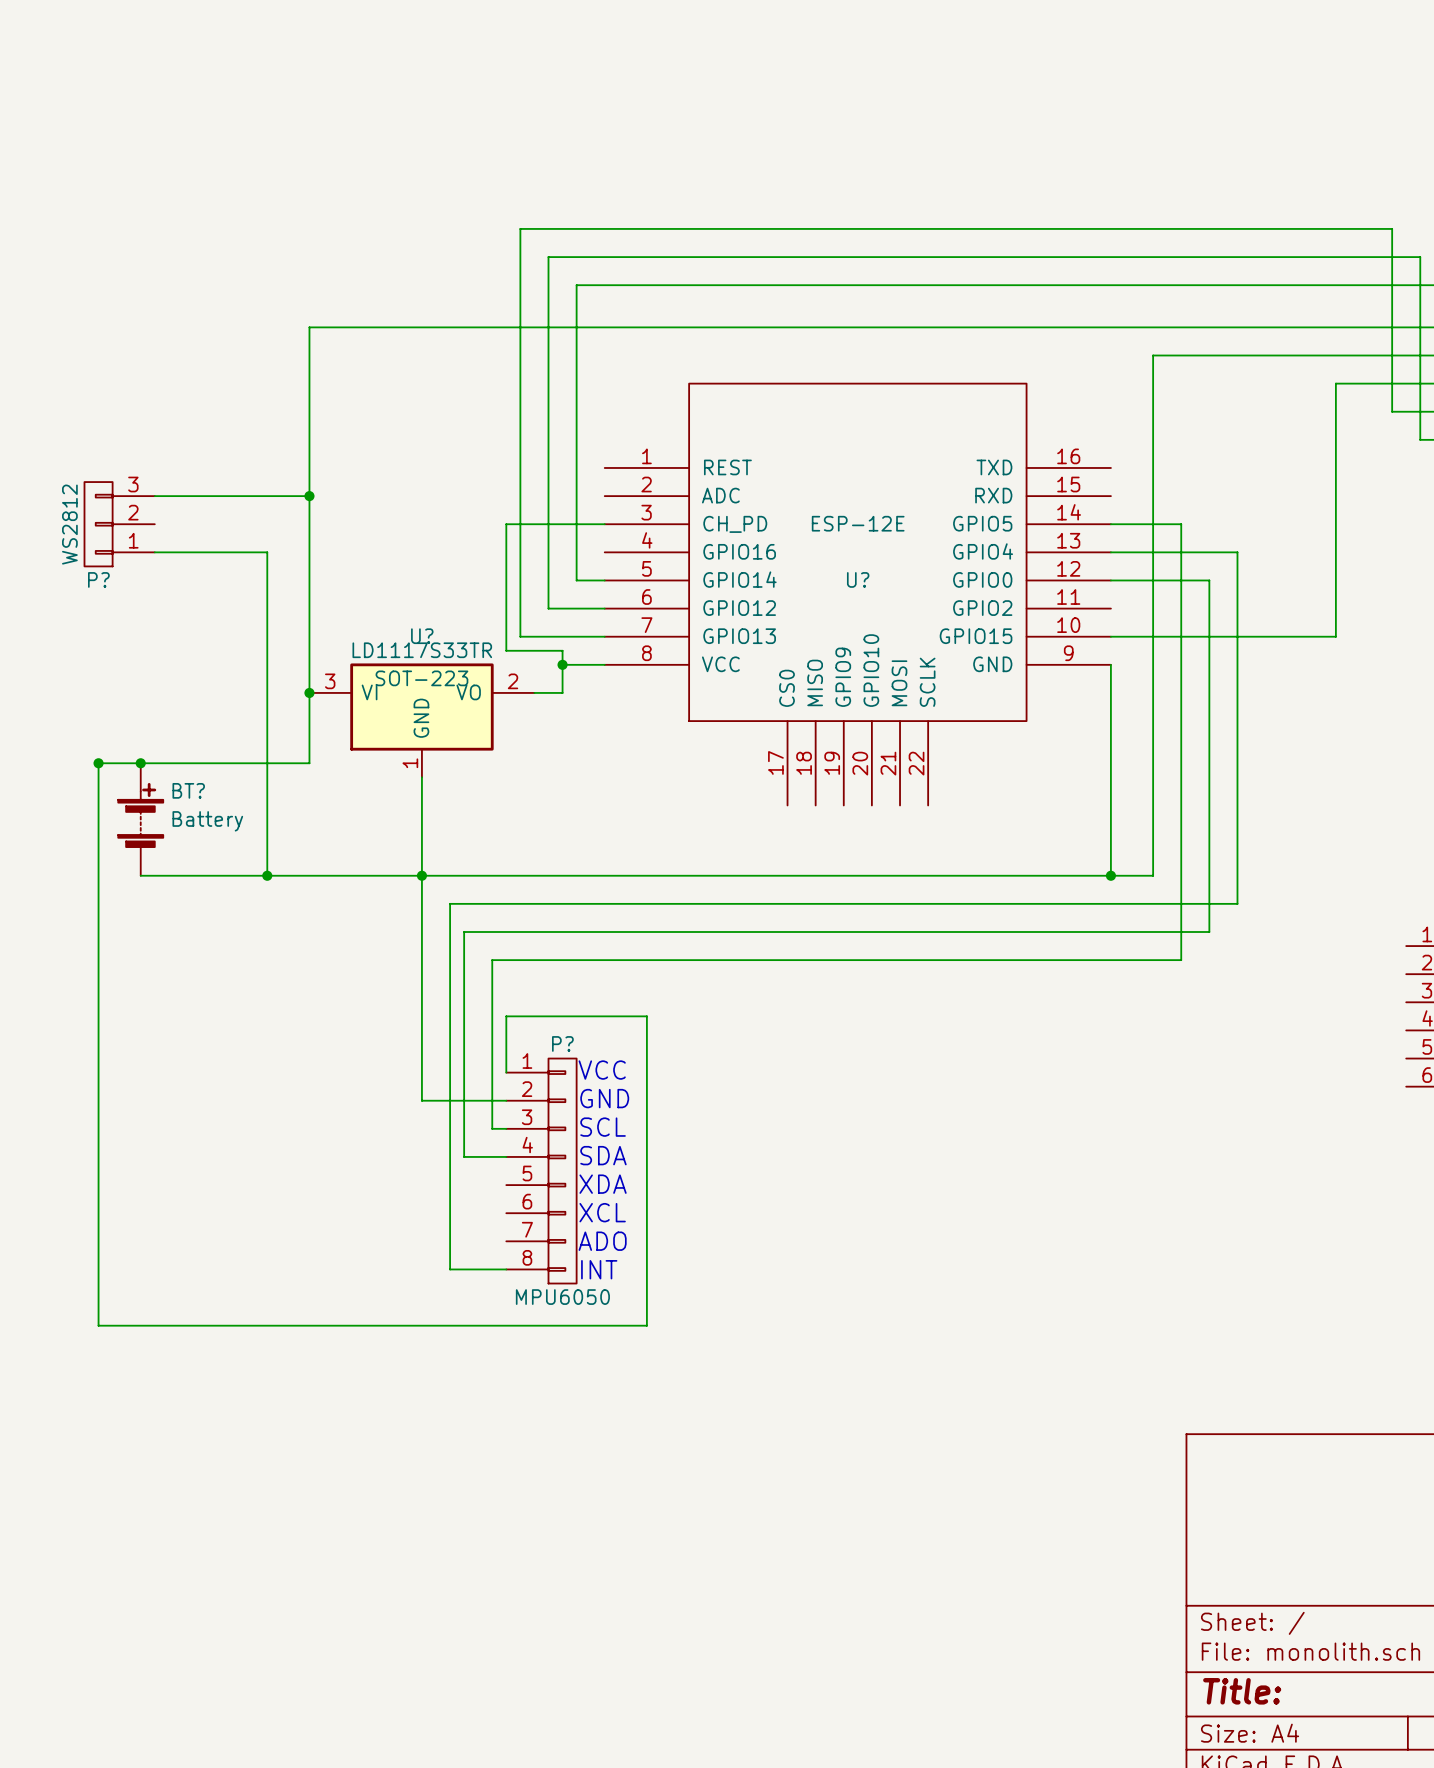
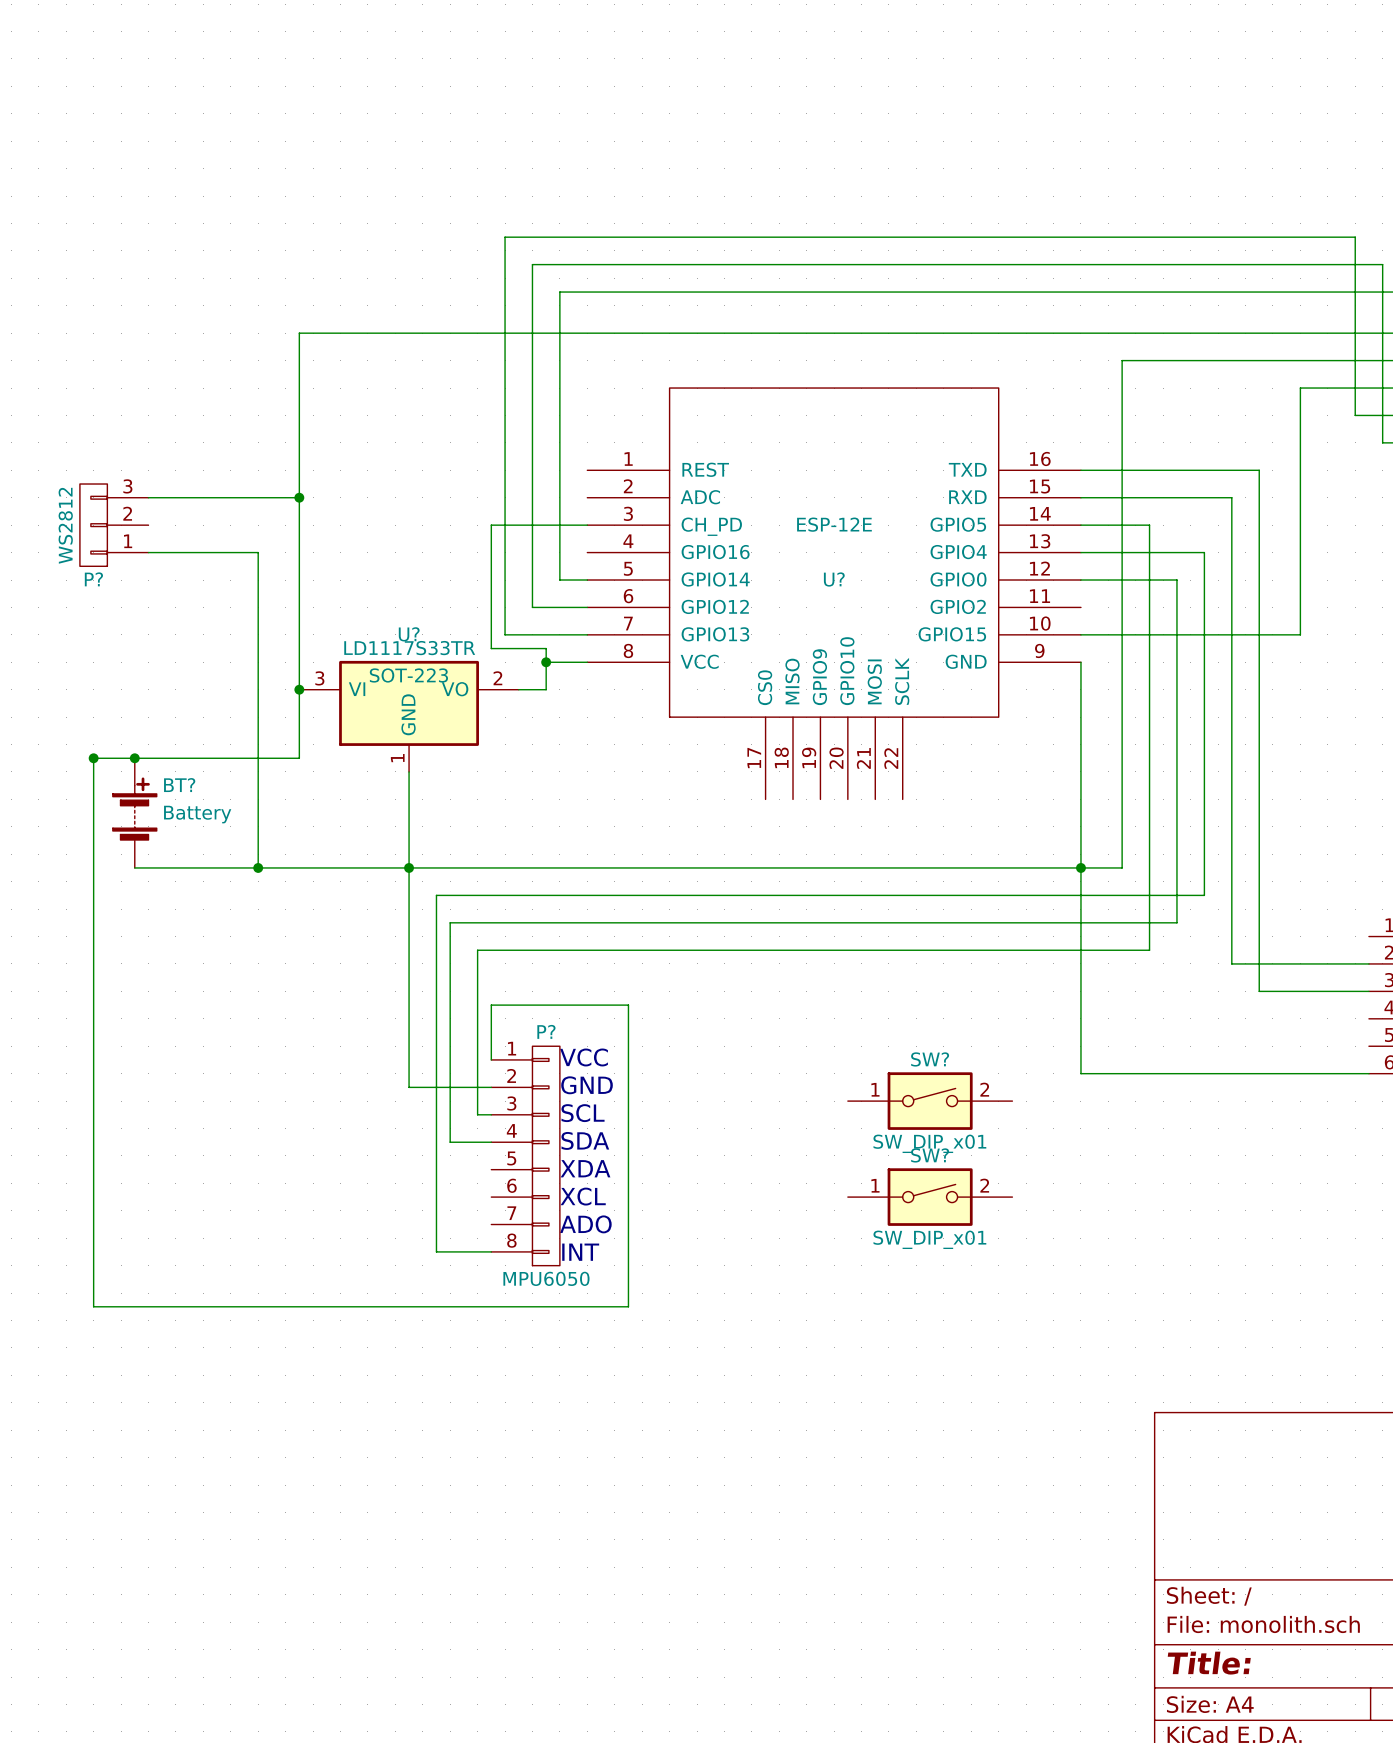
wire: none -> (1080, 470) (1259, 470) (1259, 991) (1368, 991)
wire: none -> (1080, 497) (1231, 497) (1231, 963) (1368, 963)
wire: none -> (1080, 867) (1080, 1073) (1368, 1073)
SW?: none -> SW_DIP_x01 (930, 1101)
SW?: none -> SW_DIP_x01 (930, 1197)

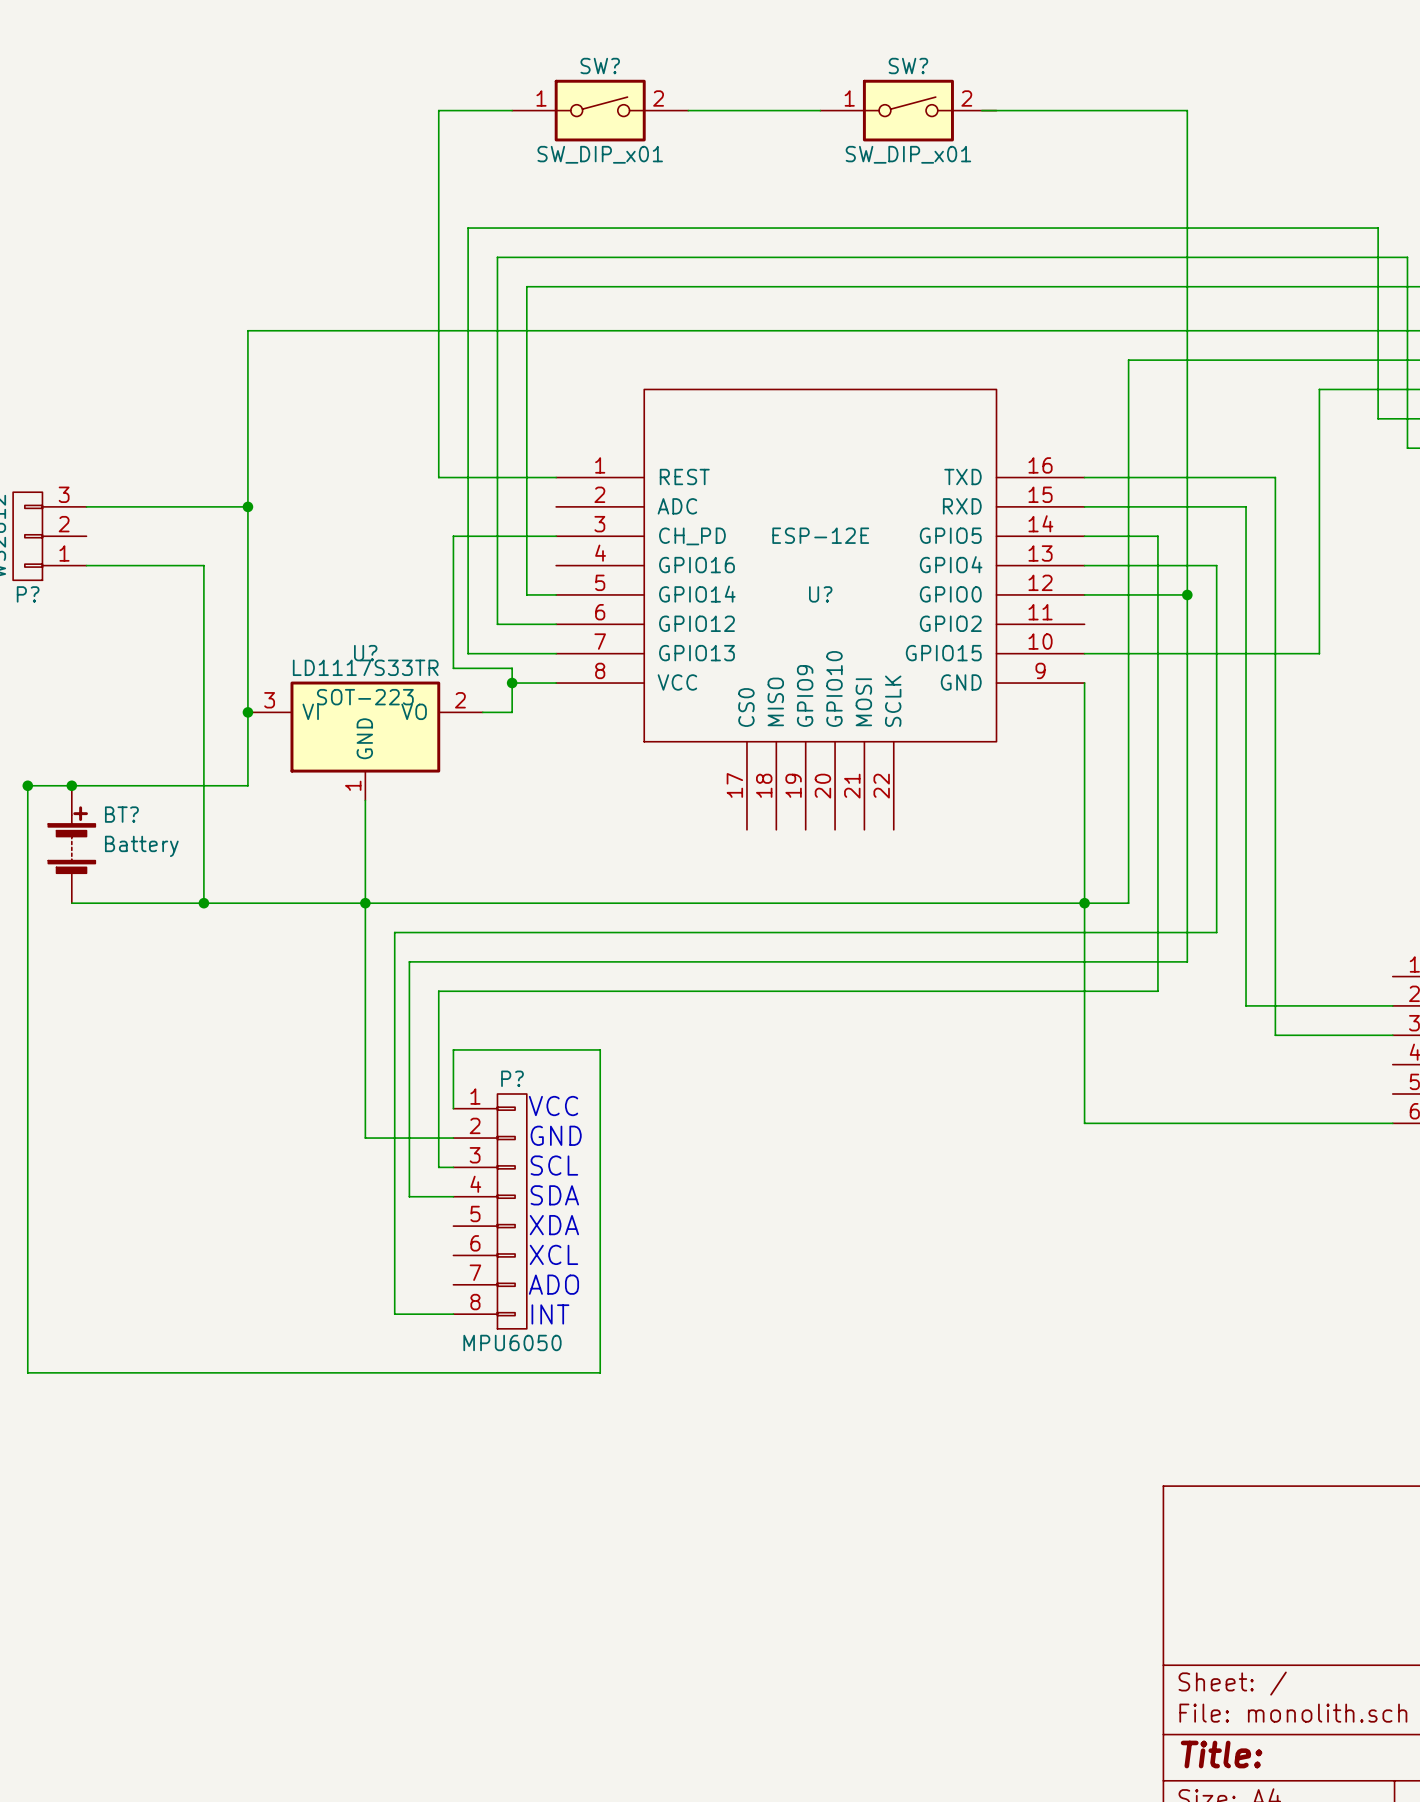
wire: none -> (512, 110) (438, 110) (438, 477) (556, 477)
SW?: none -> SW_DIP_x01 (600, 110)
wire: none -> (688, 110) (820, 110)
SW?: none -> SW_DIP_x01 (908, 110)
wire: none -> (981, 110) (1187, 110) (1187, 594)
junction: none -> (1187, 594)
SW?: SW_DIP_x01 (930, 1101) -> none
SW?: SW_DIP_x01 (930, 1197) -> none

